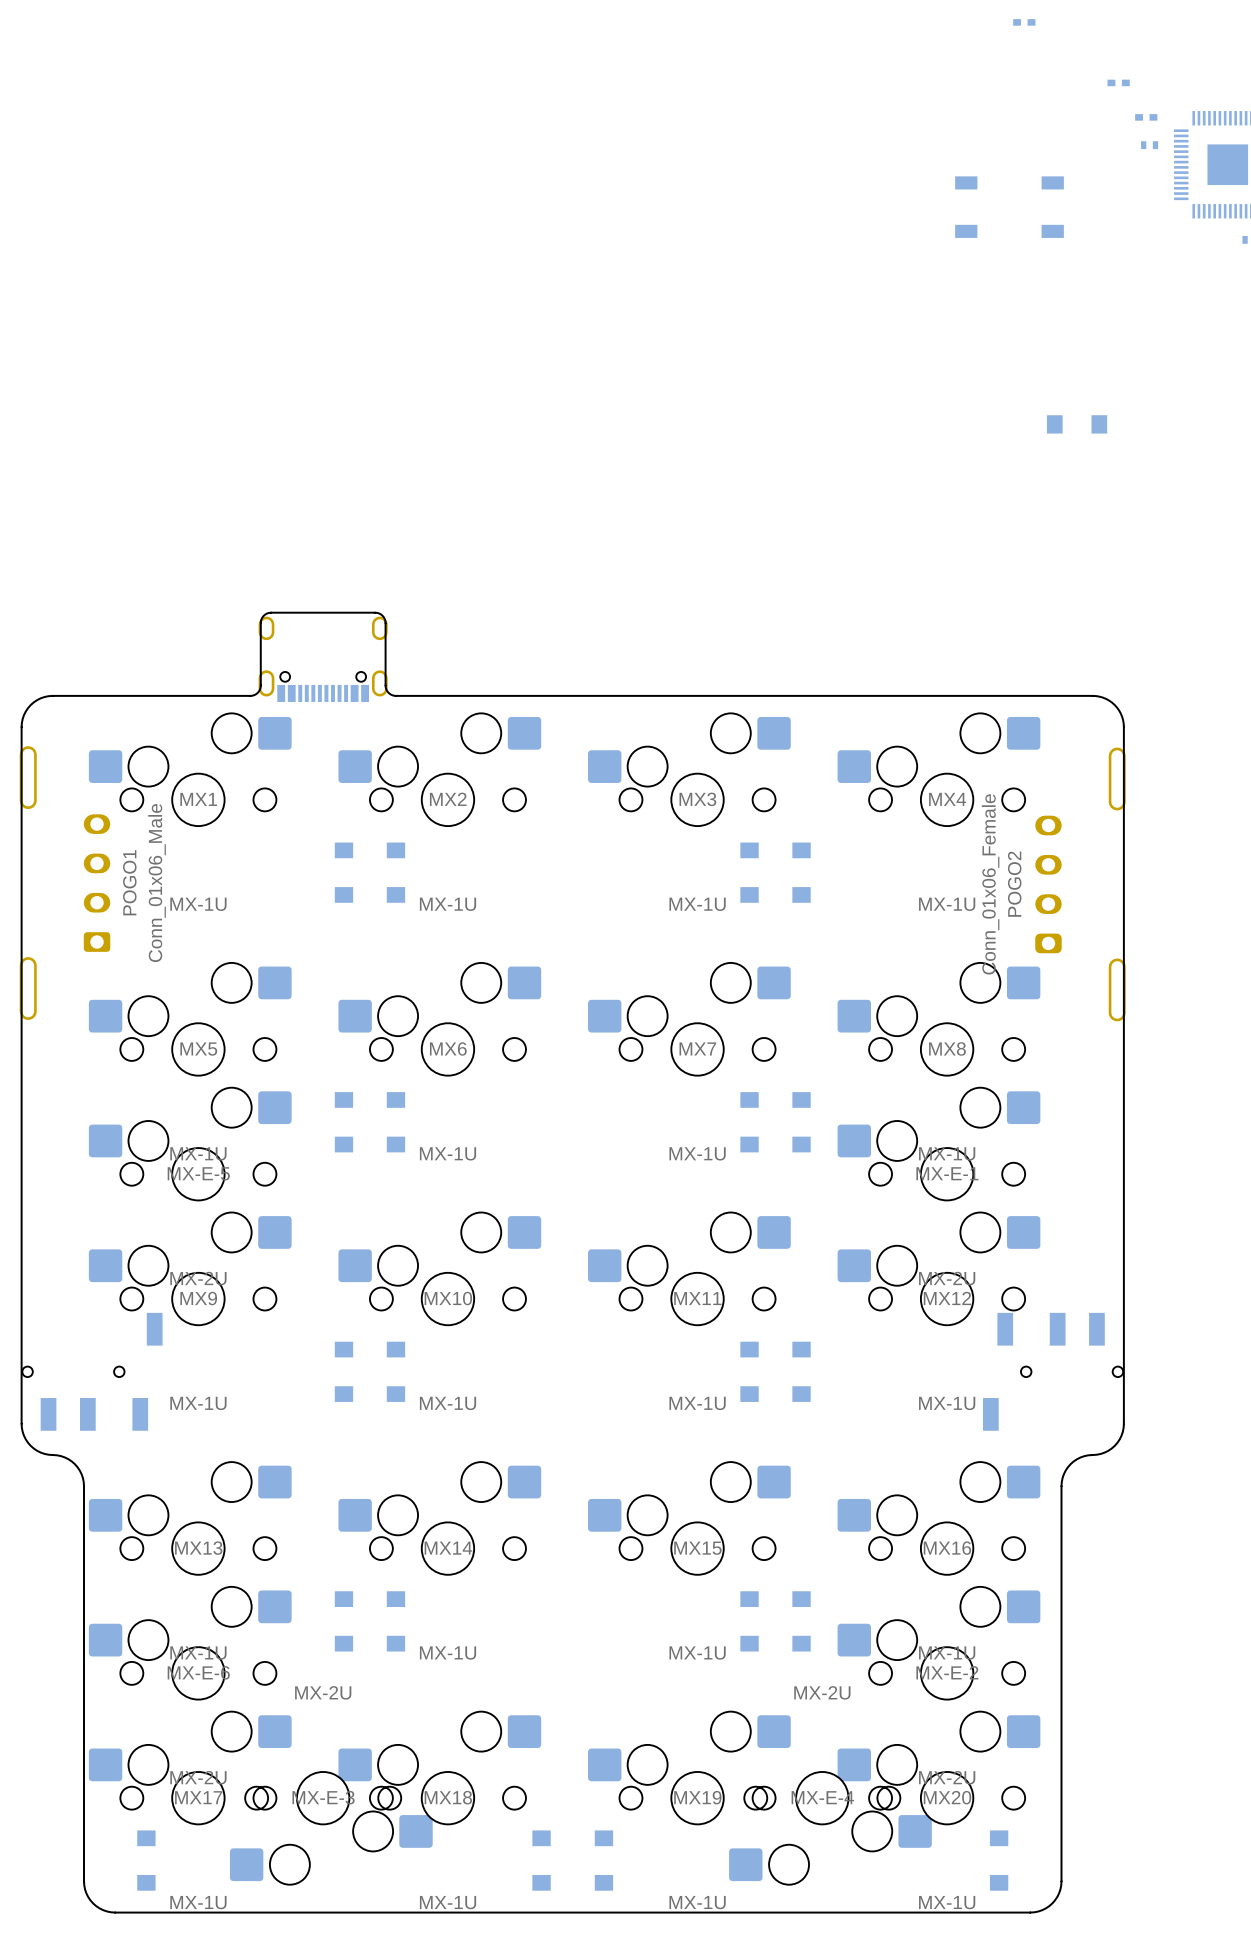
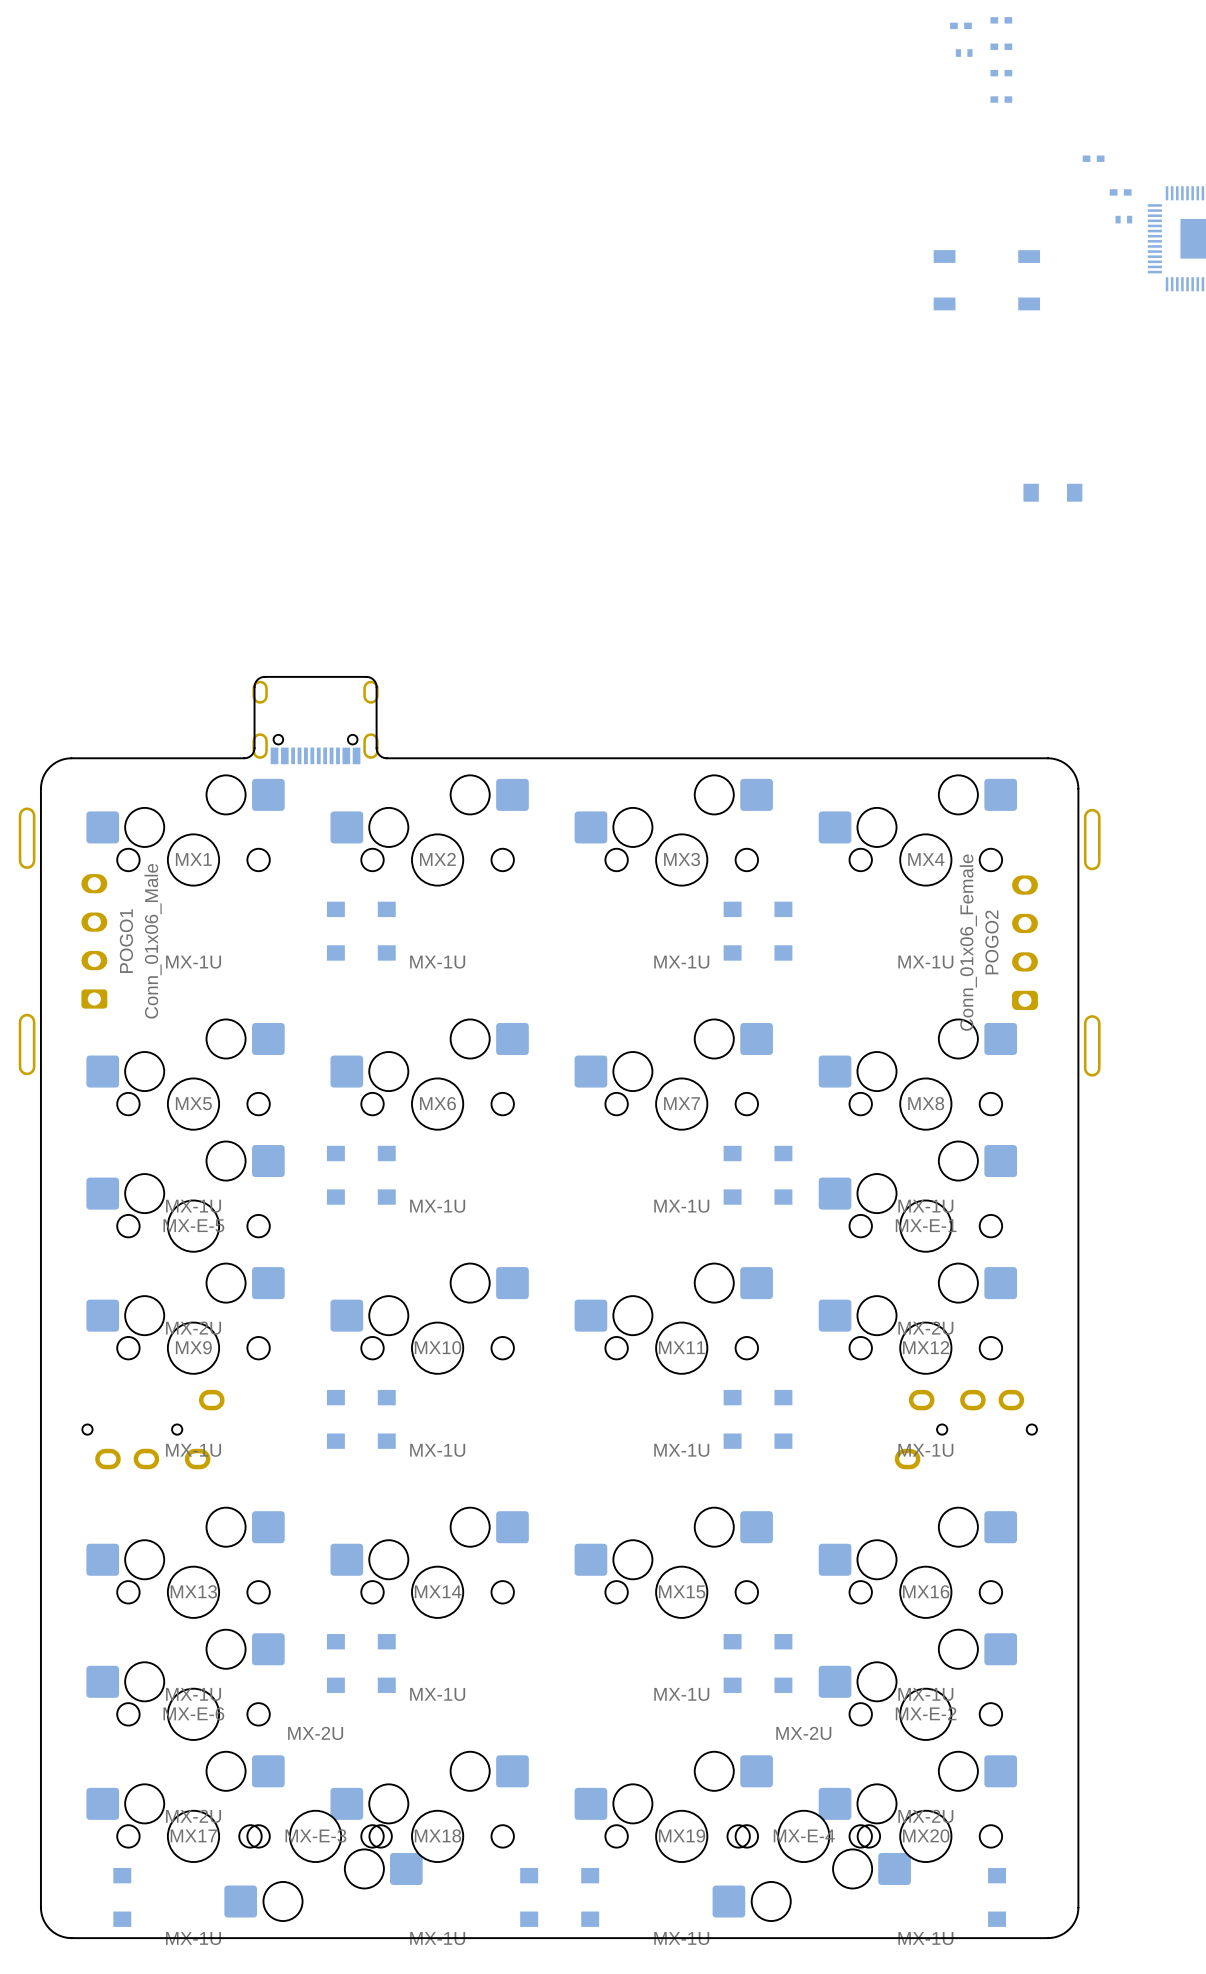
board edge: (73, 695) (48, 696) (37, 700) (25, 711) (21, 723) (21, 1423) (23, 1435) (30, 1445) (40, 1452) (60, 1456) (71, 1461) (79, 1470) (83, 1482) (84, 1885) (88, 1896) (96, 1906) (103, 1910) (115, 1912) (1030, 1912) (1045, 1908) (1055, 1900) (1060, 1889) (1061, 1881) (1061, 1482) (1065, 1470) (1073, 1461) (1084, 1456) (1104, 1452) (1114, 1445) (1121, 1435) (1123, 1423) (1123, 723) (1119, 710) (1106, 698) (1096, 696) (1071, 695) -> (71, 758) (59, 760) (49, 767) (43, 777) (40, 788) (40, 1907) (43, 1919) (49, 1929) (59, 1935) (71, 1938) (1047, 1938) (1061, 1935) (1071, 1926) (1076, 1917) (1078, 1907) (1078, 788) (1076, 778) (1069, 767) (1061, 761) (1047, 758)
part: (92, 1371) -> none
part: (1053, 1371) -> none
part: none -> (153, 1429)
part: none -> (965, 1429)
part position: (146, 1860) -> (122, 1897)
part position: (999, 1860) -> (997, 1897)

